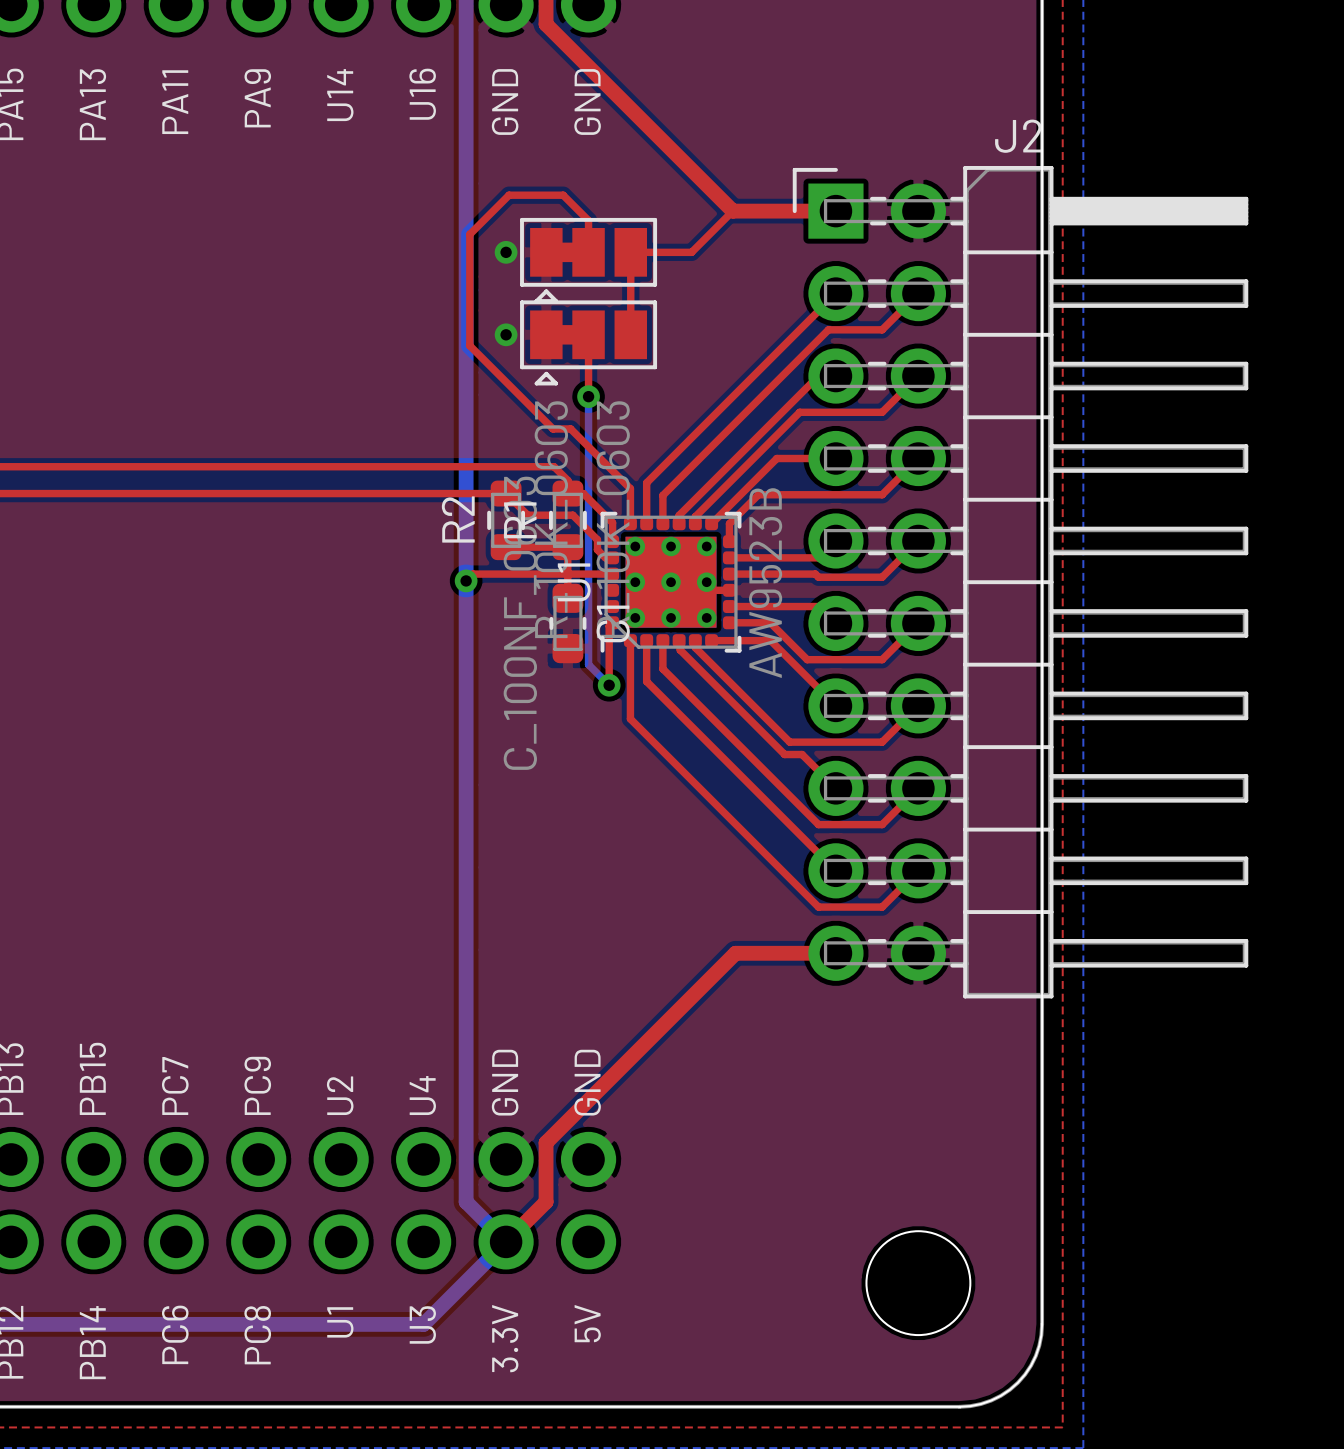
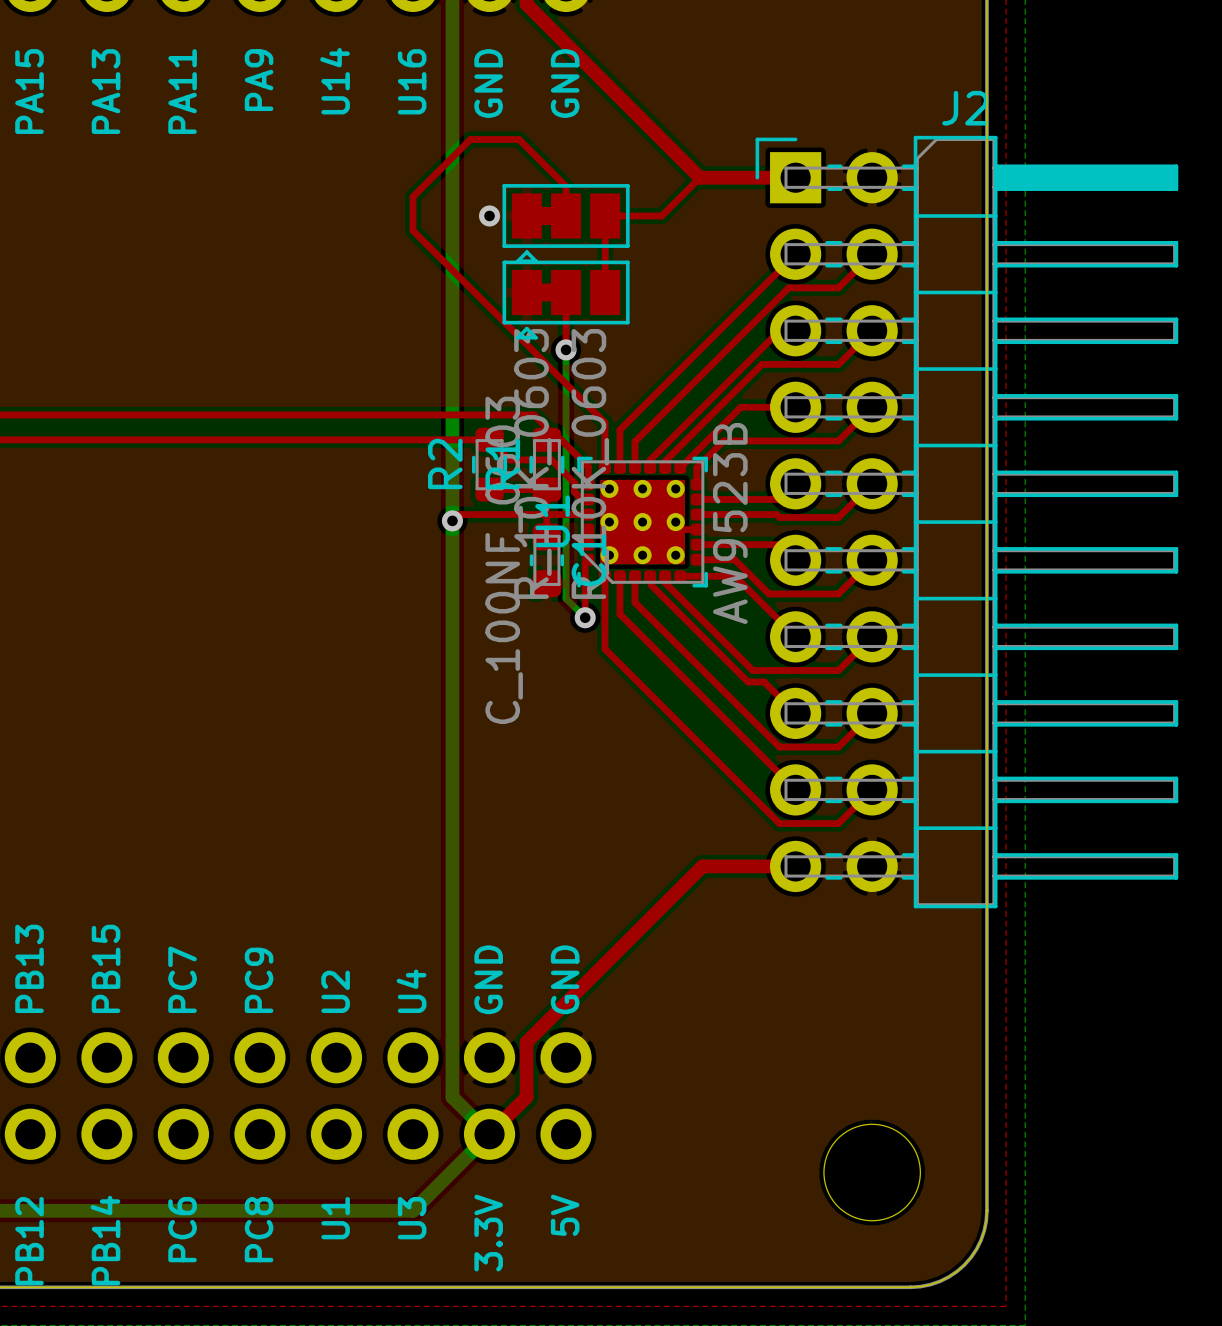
top track: (563, 195) (509, 195) (469, 234) (469, 345) (553, 428) (570, 428) (630, 488) -> (542, 162) (519, 139) (470, 139) (413, 196) (413, 230) (604, 422) (604, 435)
via: (506, 334) -> none

